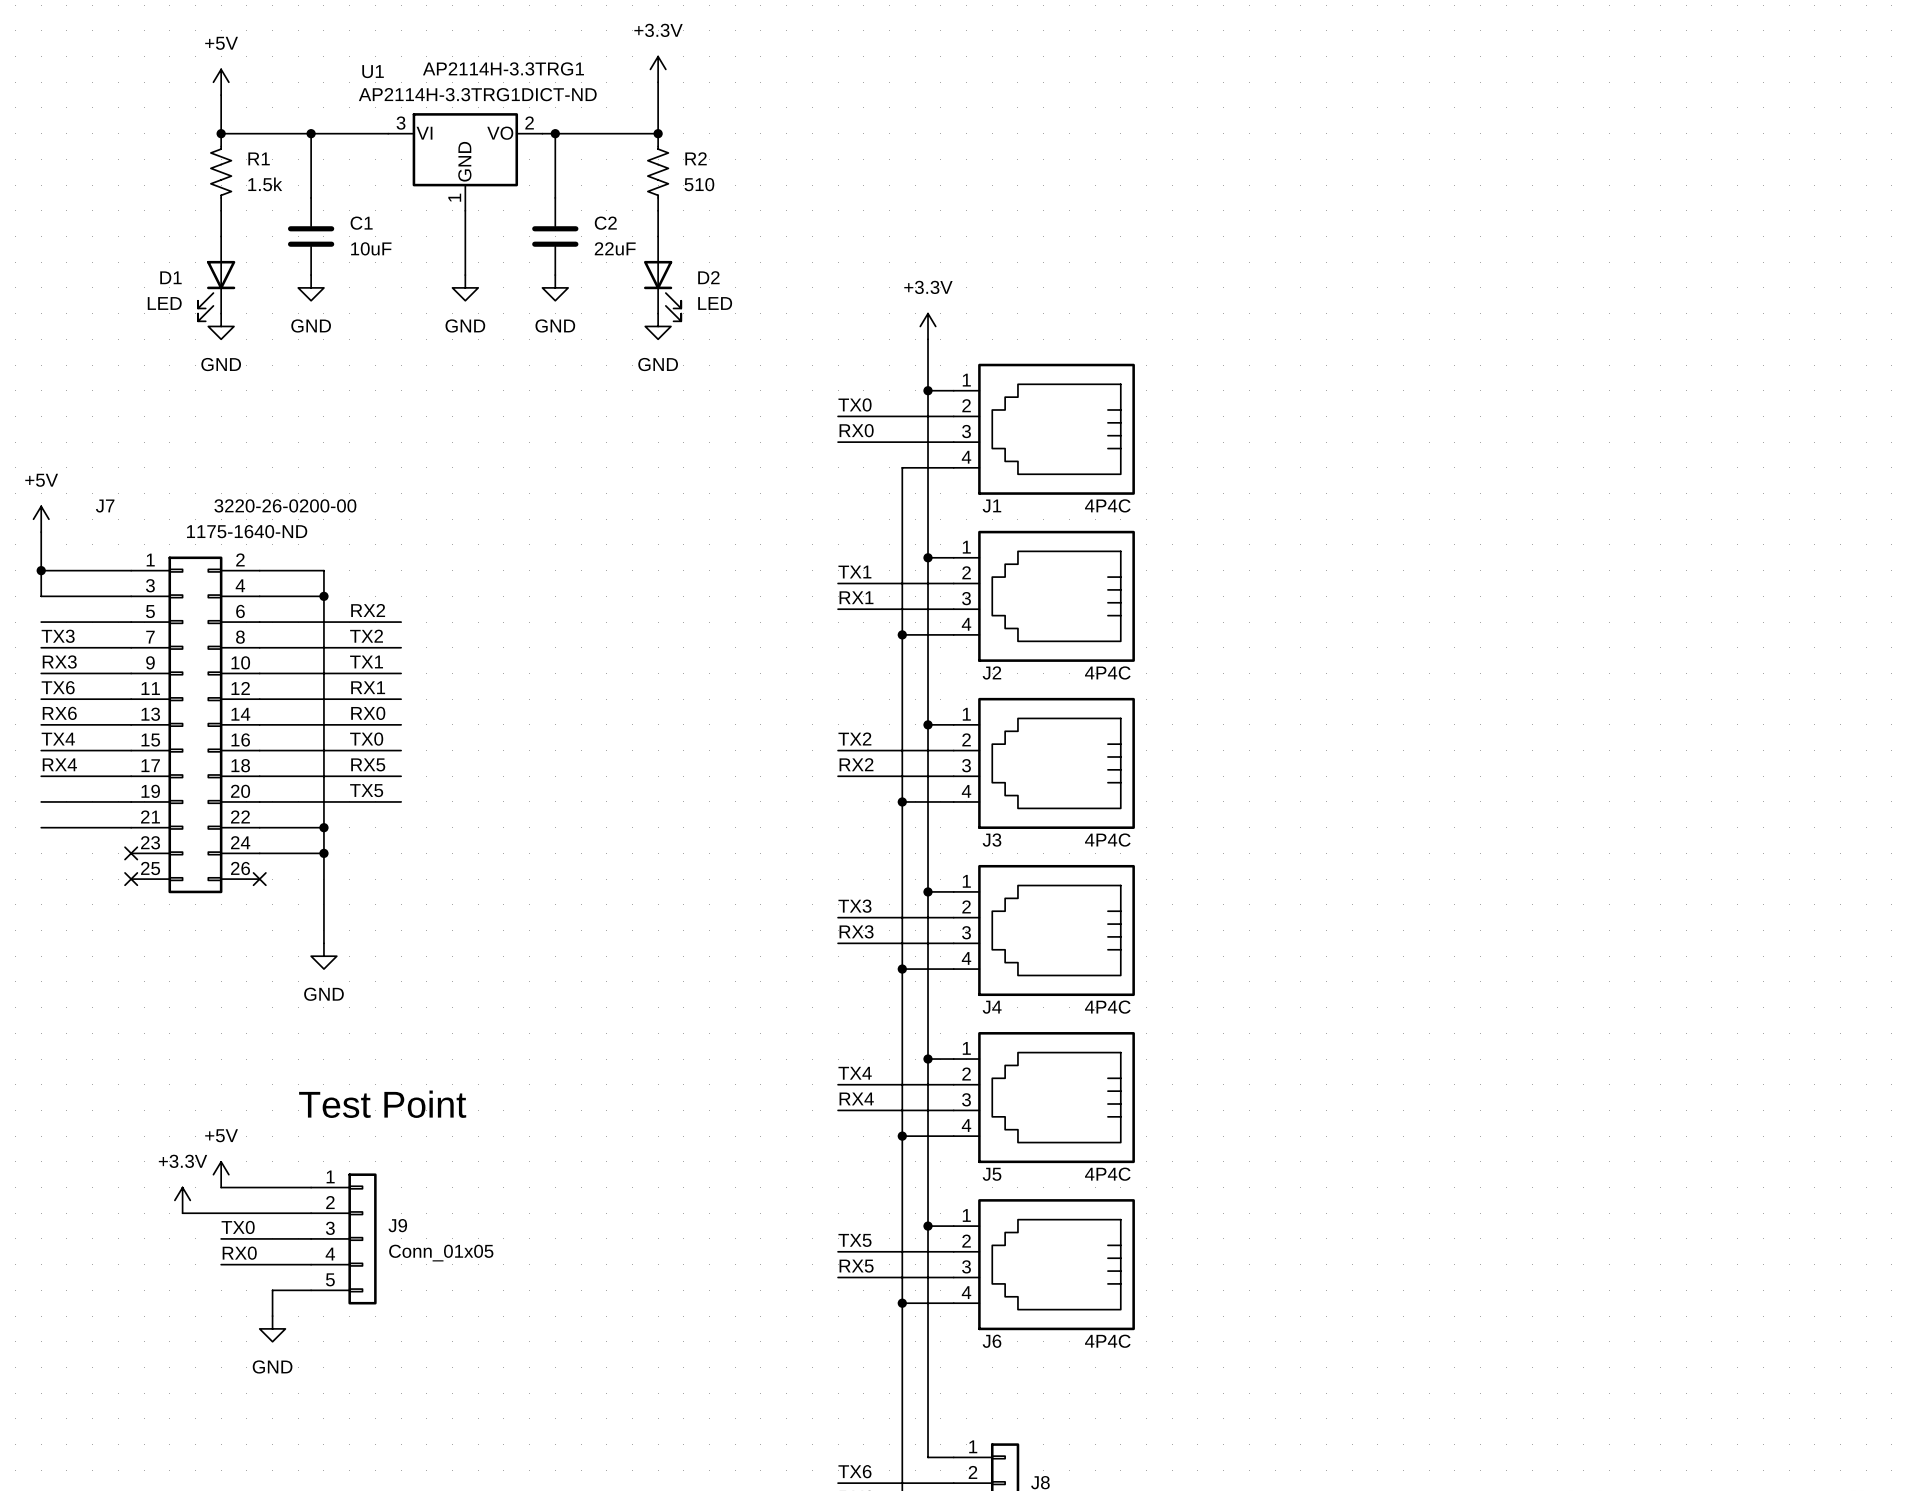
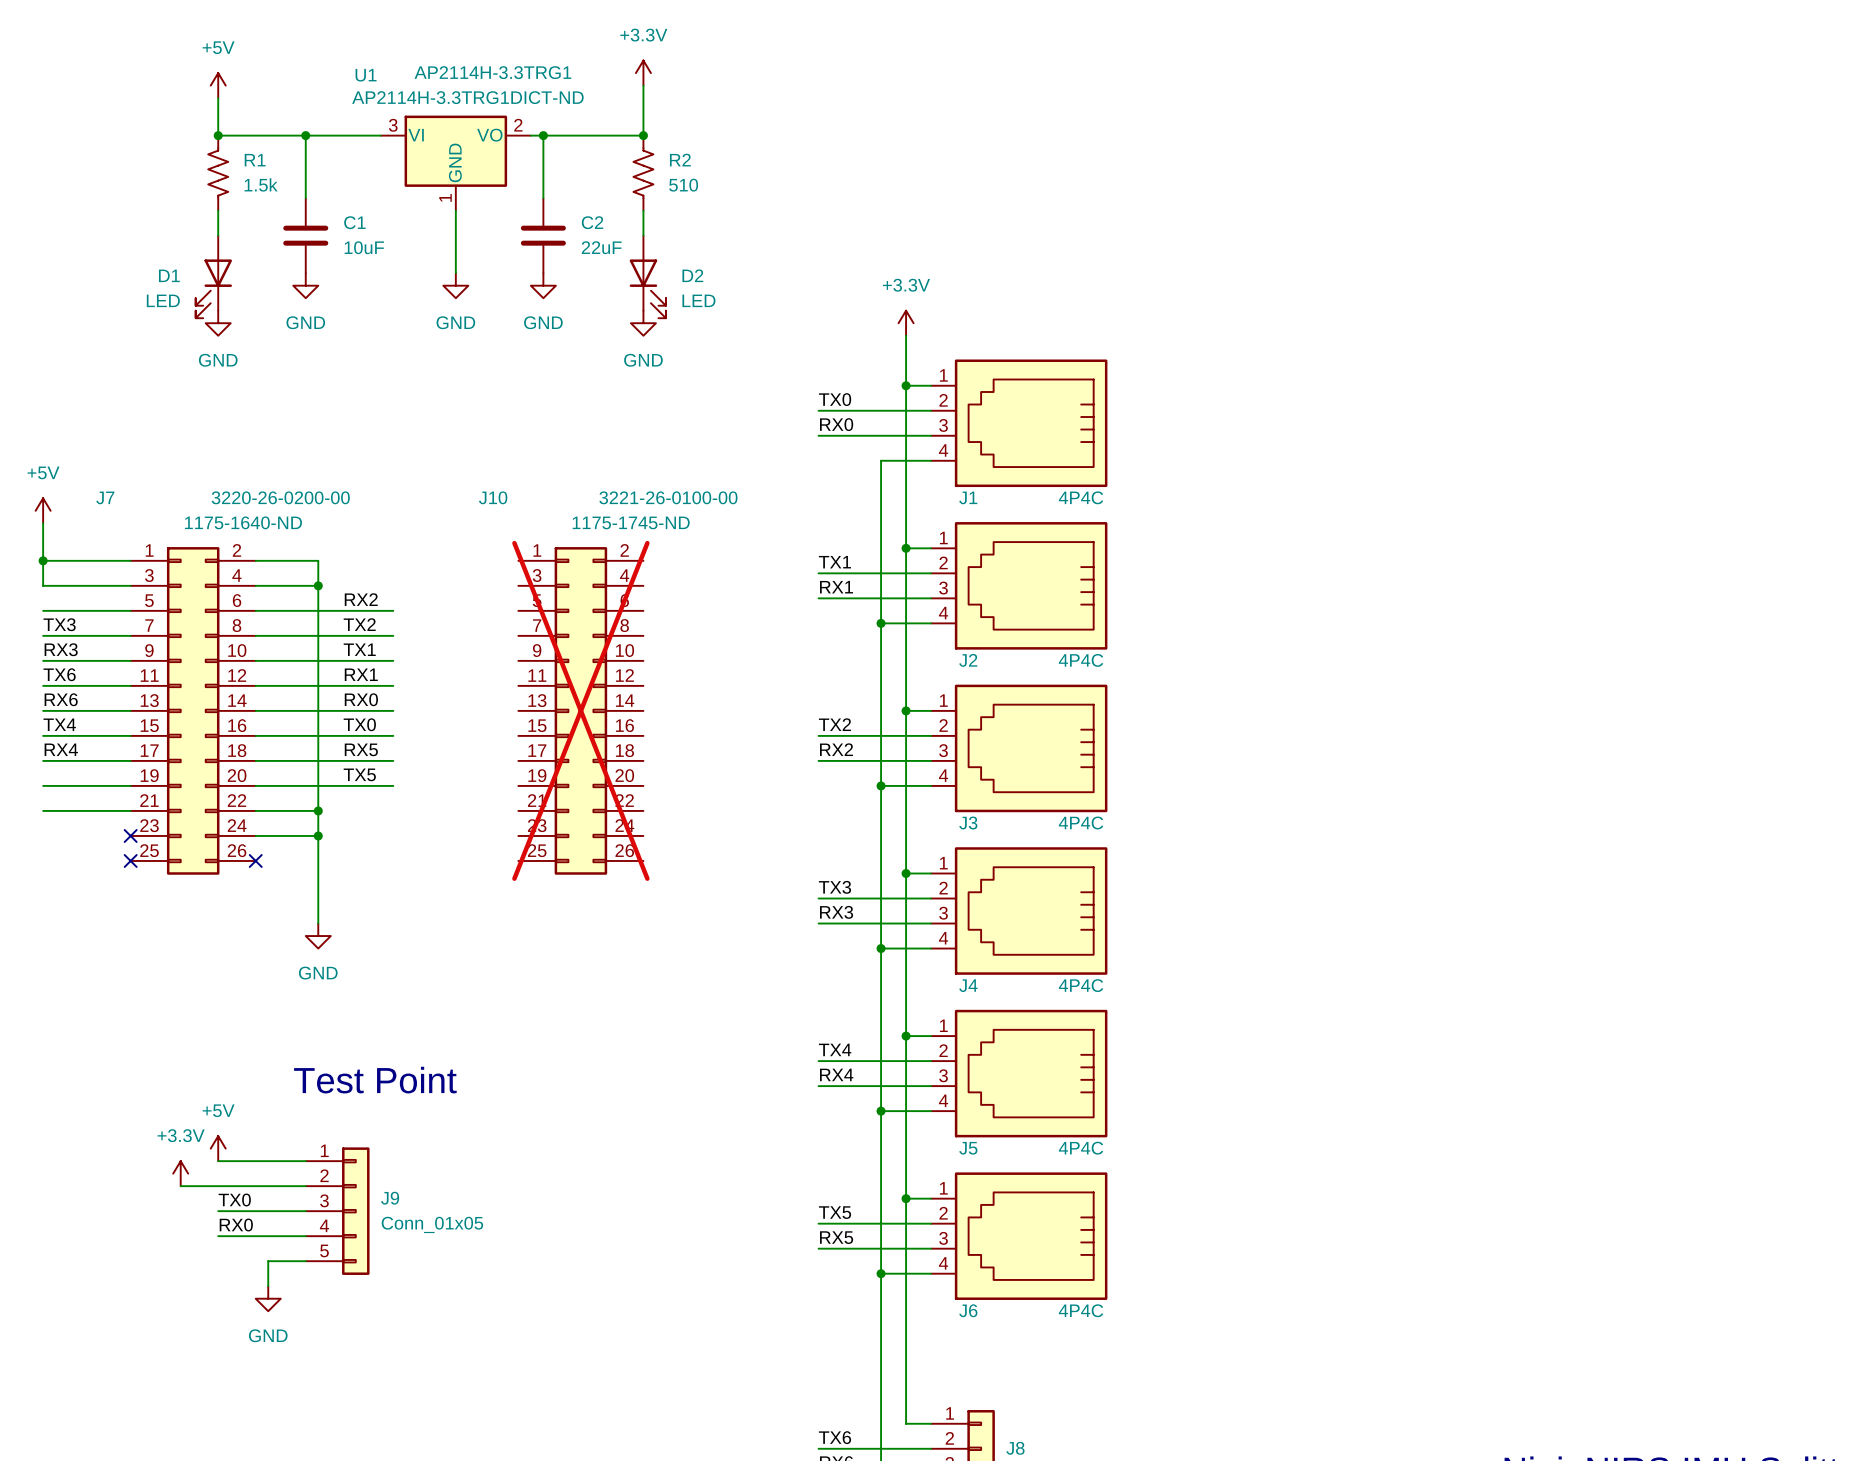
J10: none -> 3221-26-0100-00 (580, 710)

